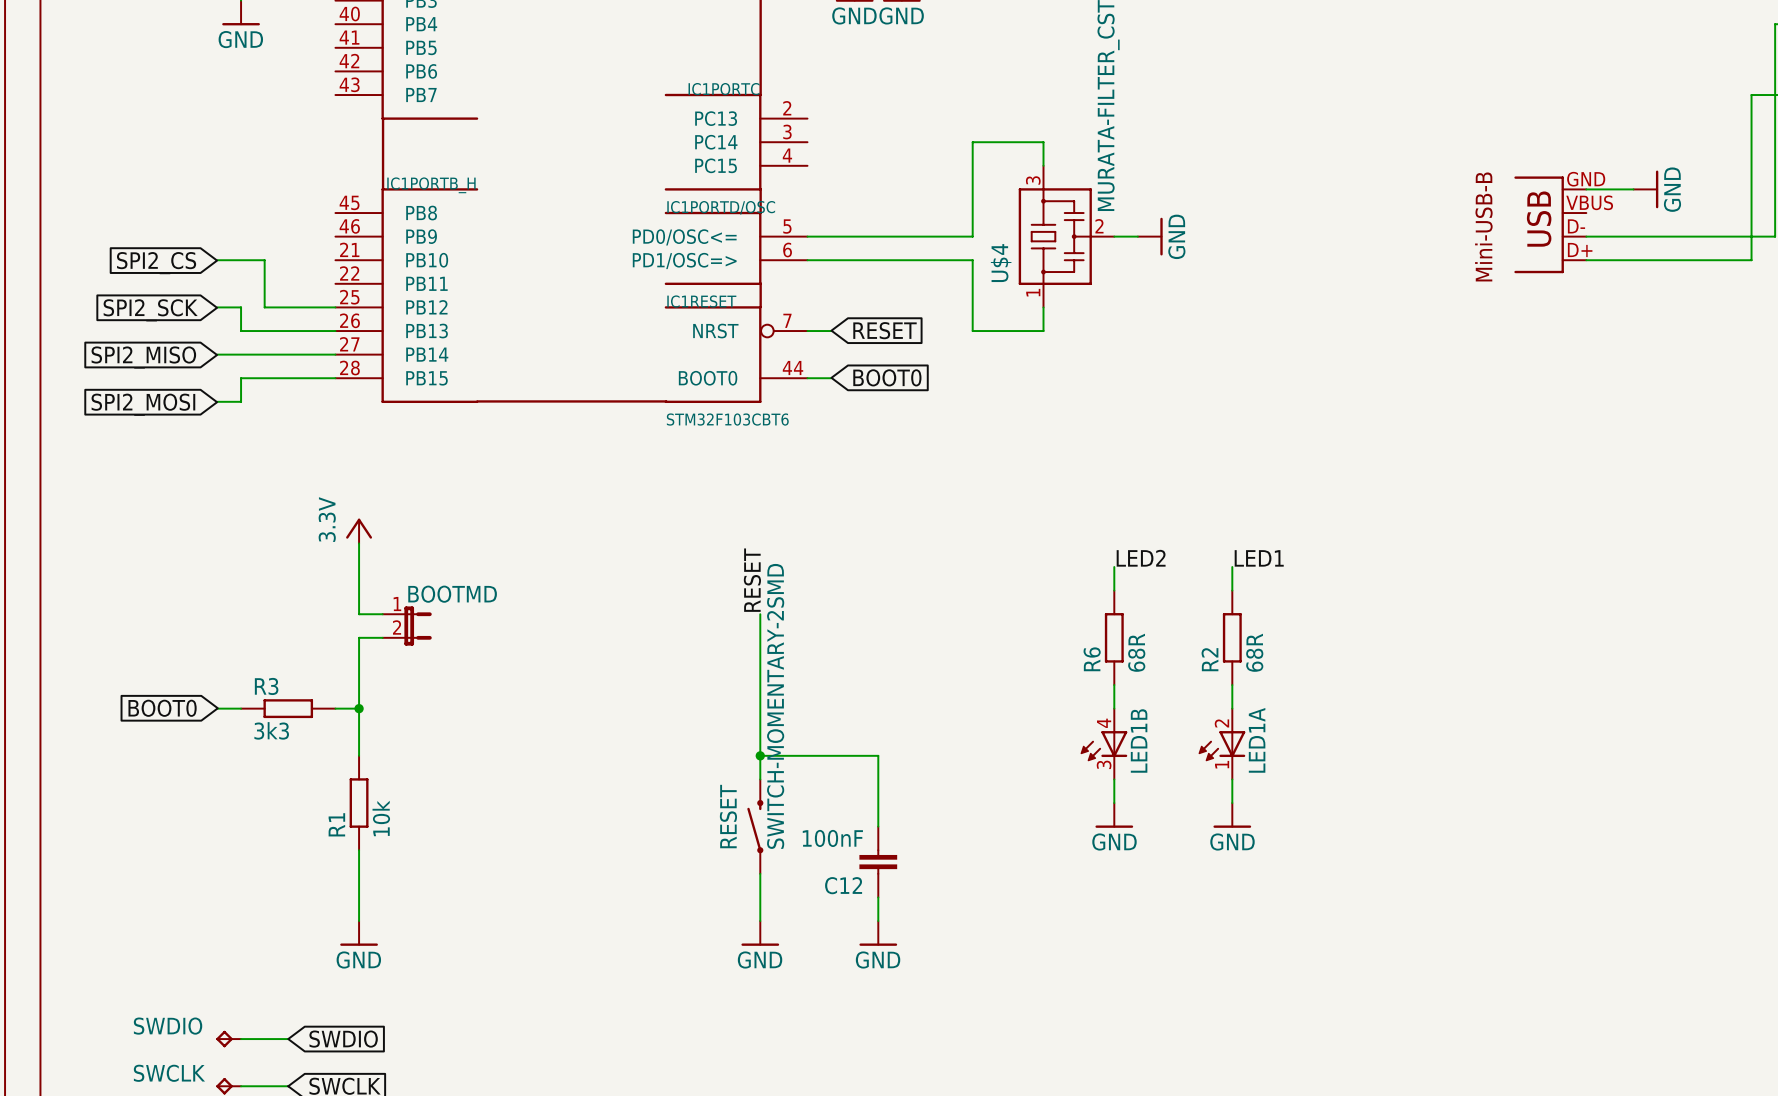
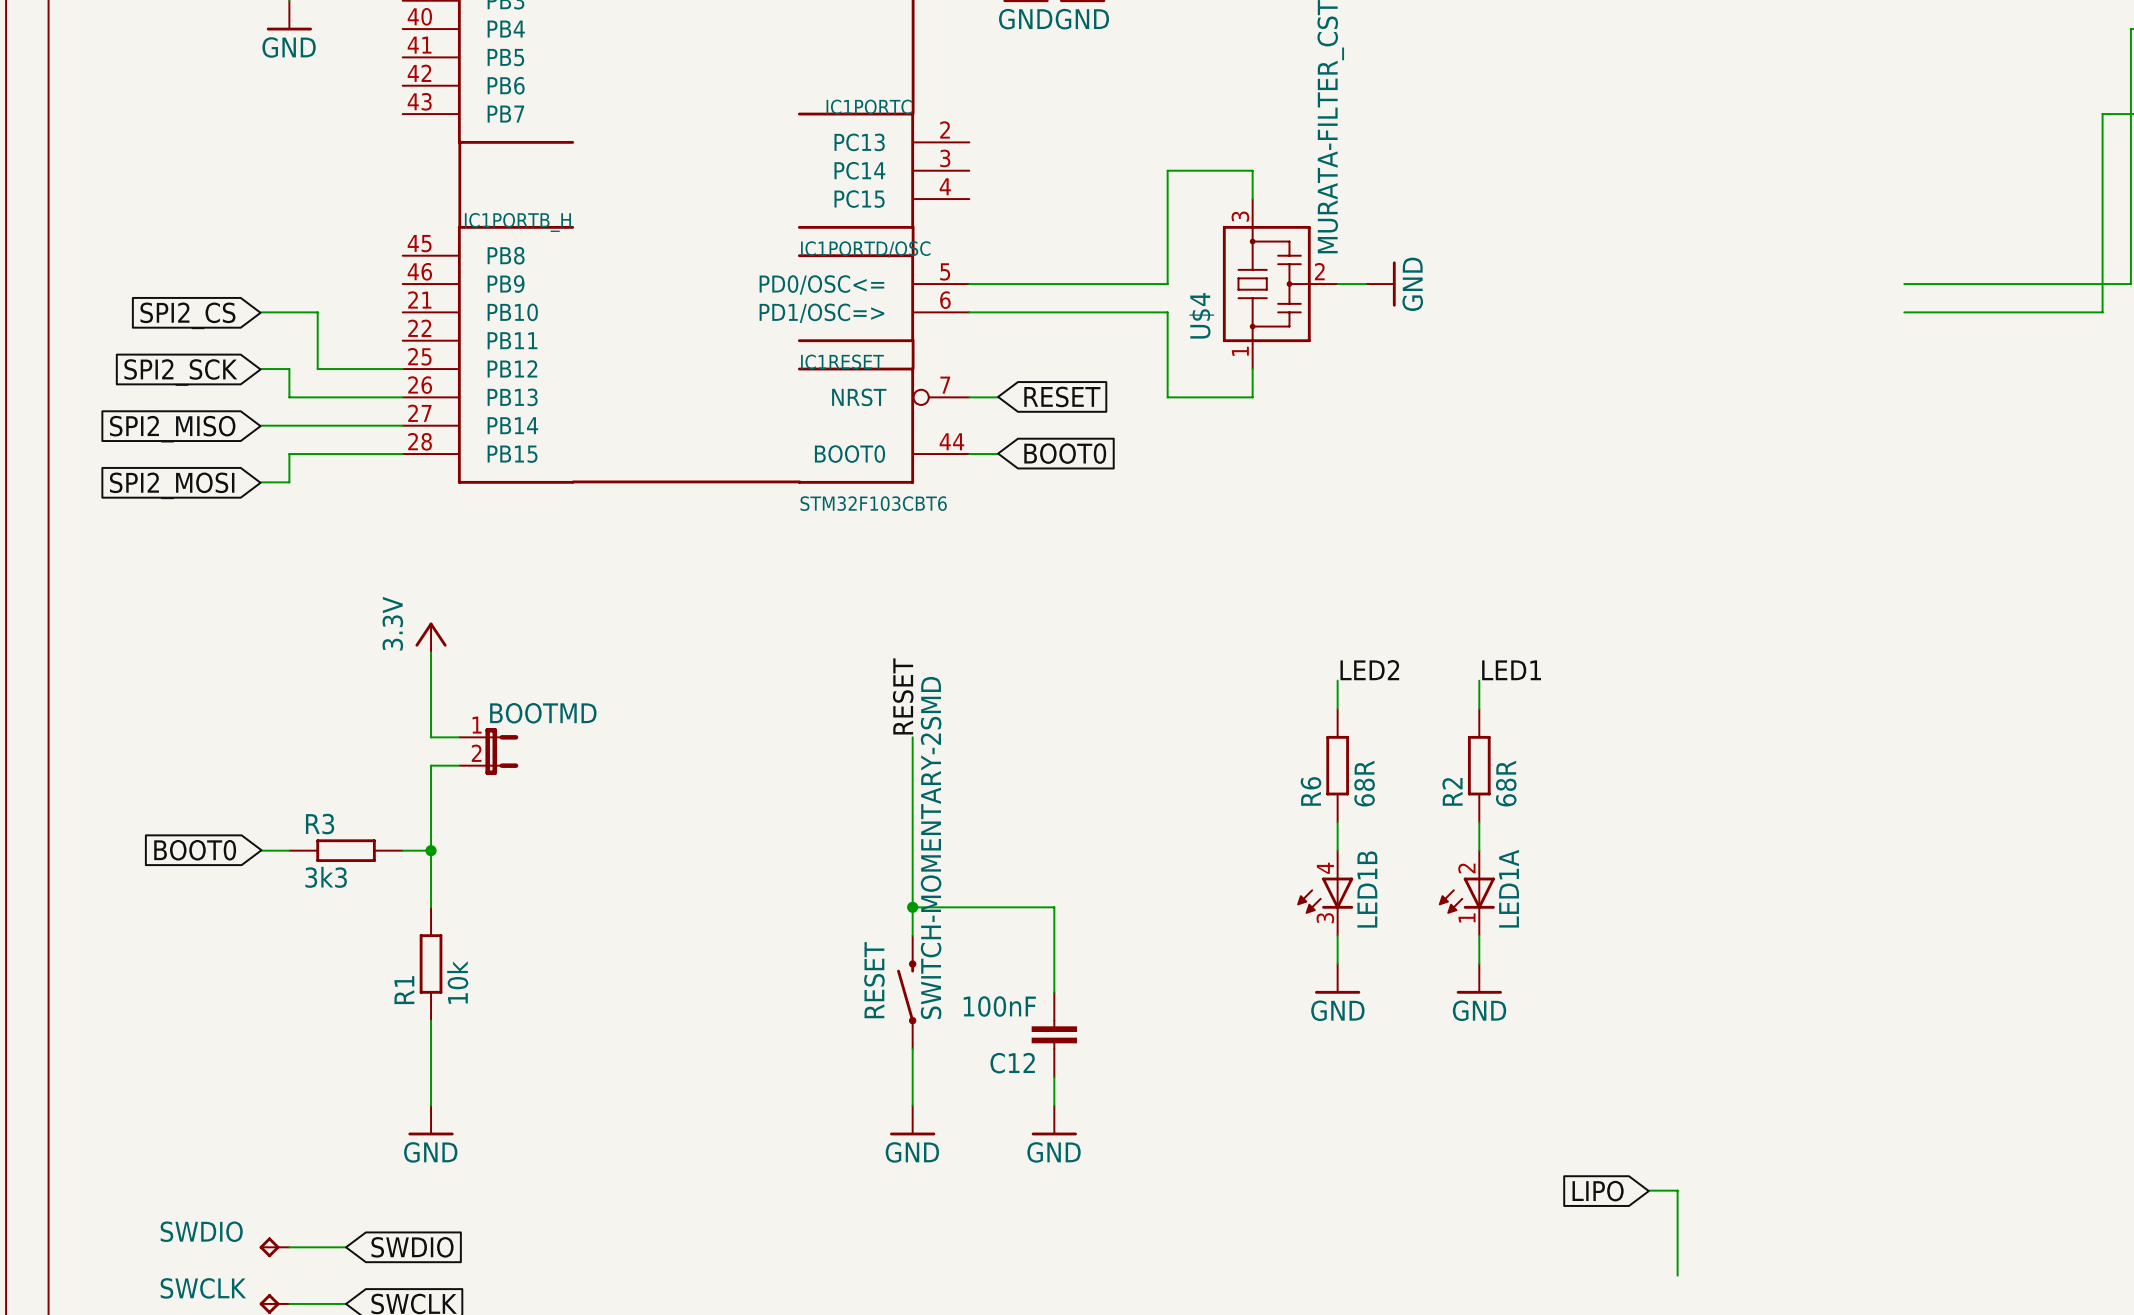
wire: (1586, 189) (1633, 189) -> none
power symbol: GND (1645, 189) -> none
part: (1550, 224) -> none
text: Mini-USB-B (1483, 226) -> none
wire: none -> (1649, 1190) (1677, 1190) (1677, 1275)
global label: none -> LIPO (1598, 1191)

